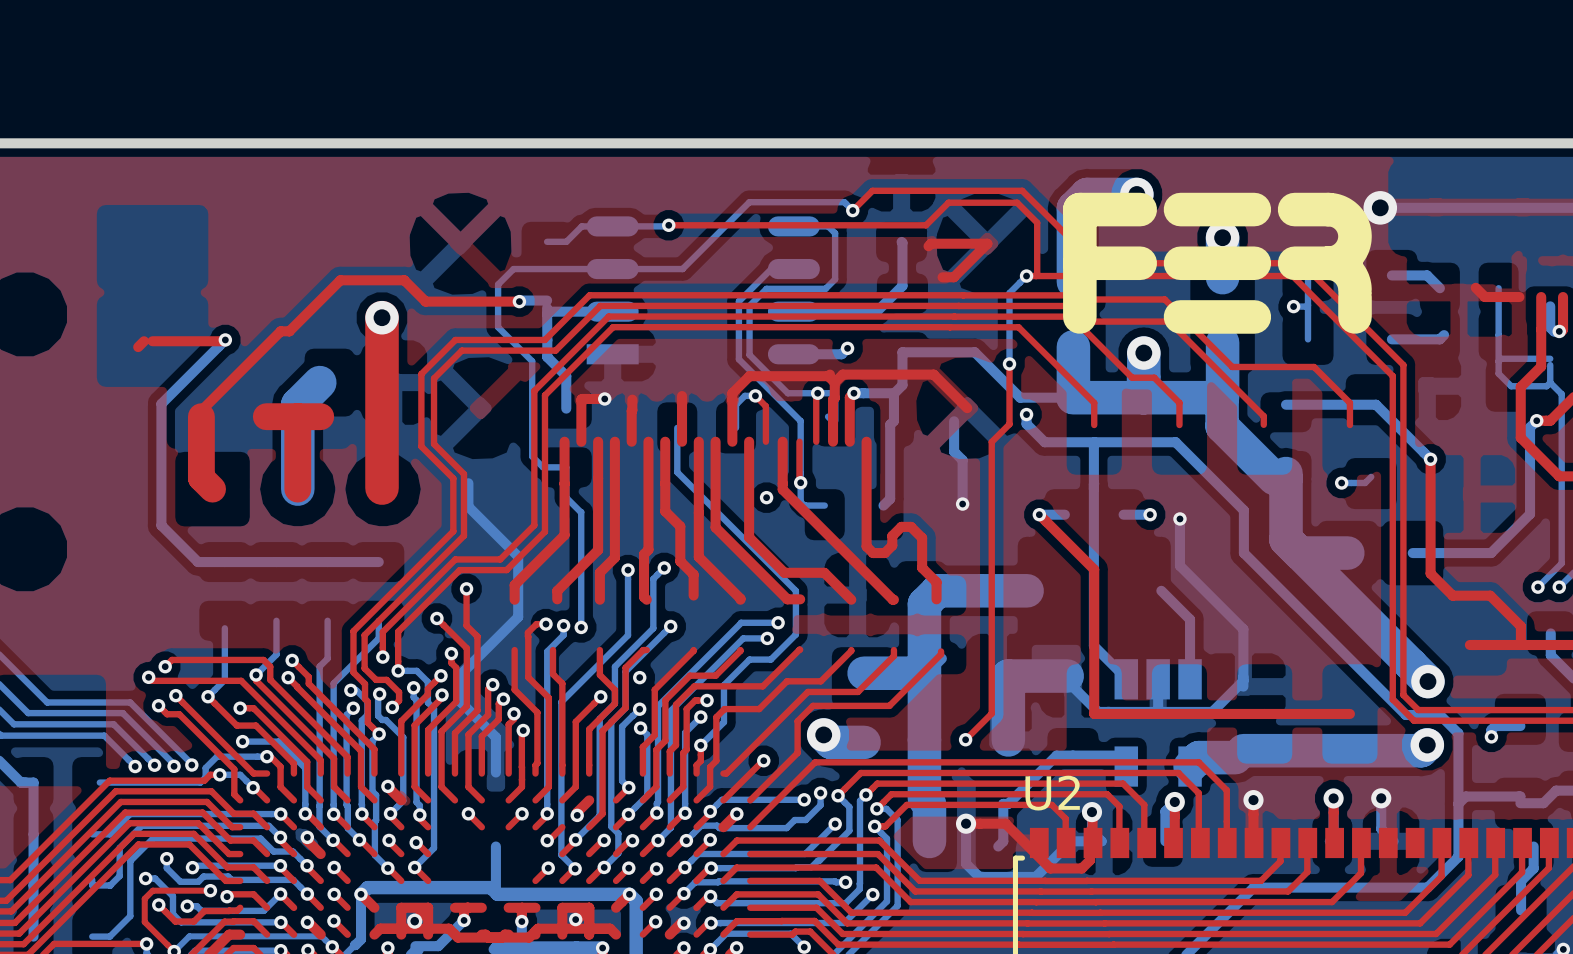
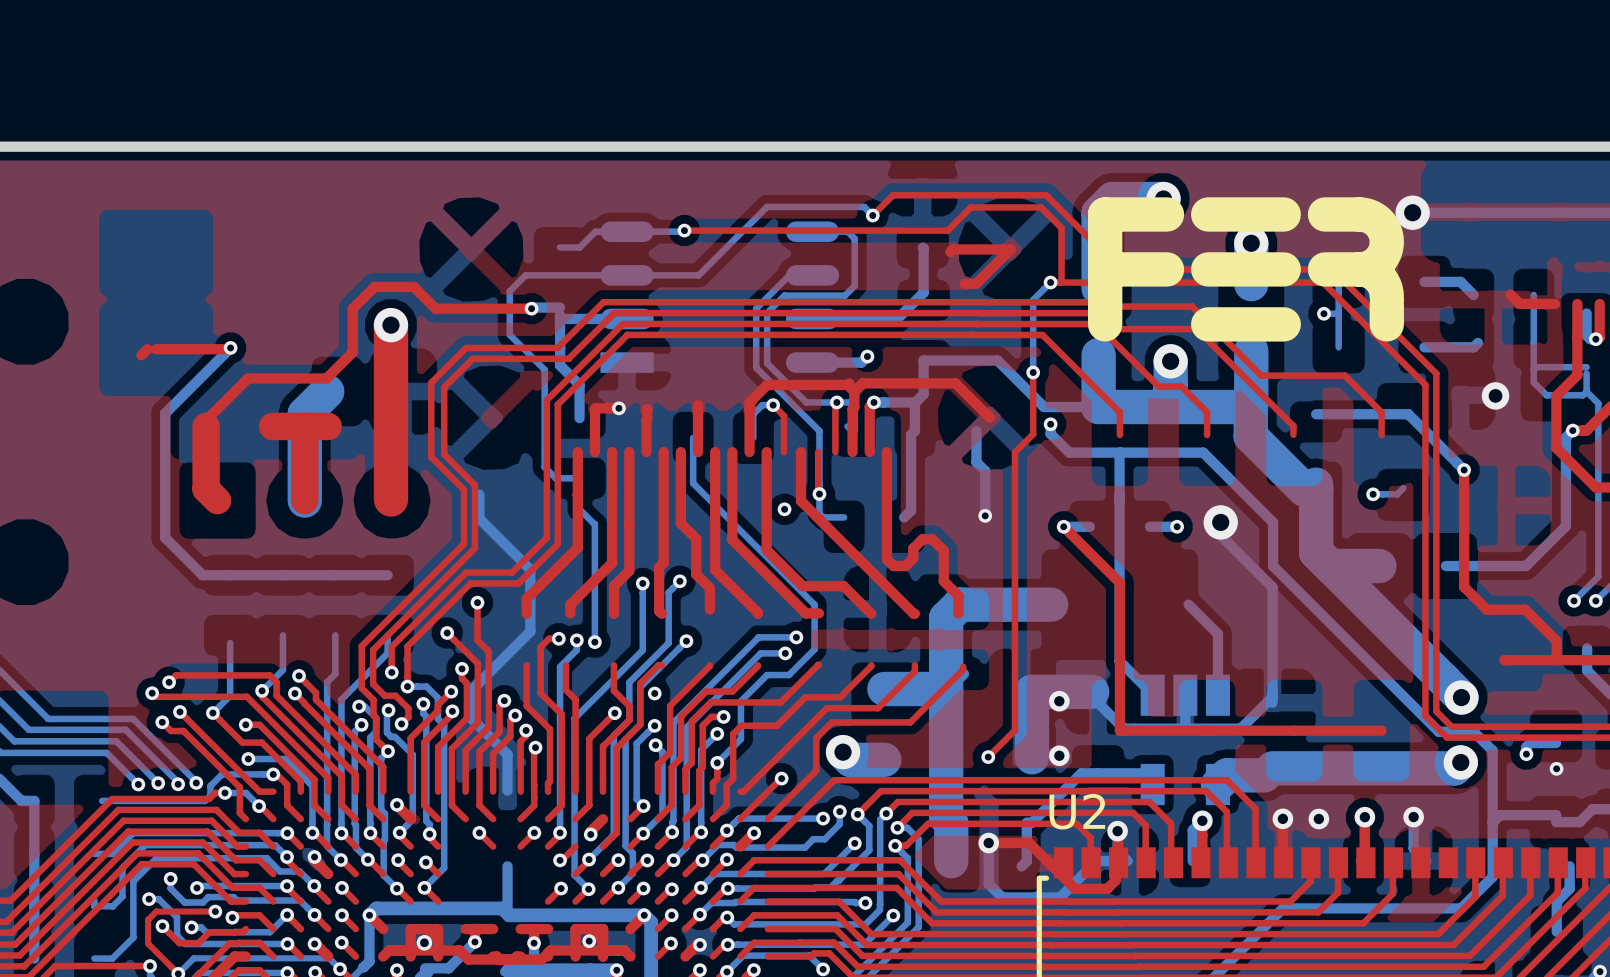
top track: (365, 280) (340, 280) (289, 331) (280, 331) (242, 369) -> (374, 286) (352, 308) (352, 352) (326, 378) (247, 378)
via: none -> (1495, 395)
via size: [1173, 512, 1187, 526] -> [1203, 505, 1238, 540]
bottom track: (1179, 518) (1179, 565) (1243, 629) -> (1220, 522) (1220, 535) (1272, 587) (1272, 644)
via: none -> (1059, 701)
via: none -> (1059, 755)
via: none -> (1556, 768)
via: none -> (1318, 819)

